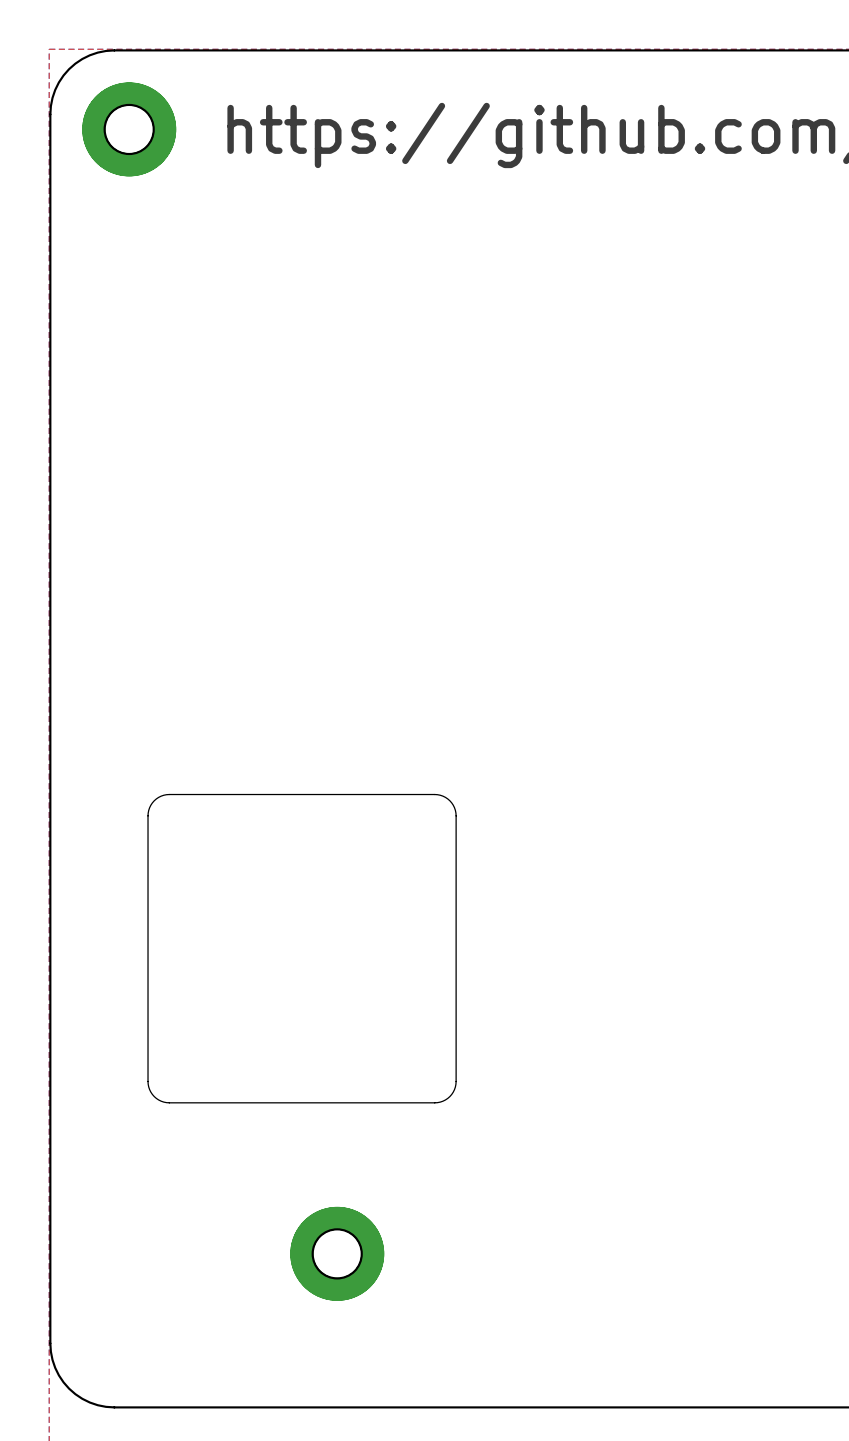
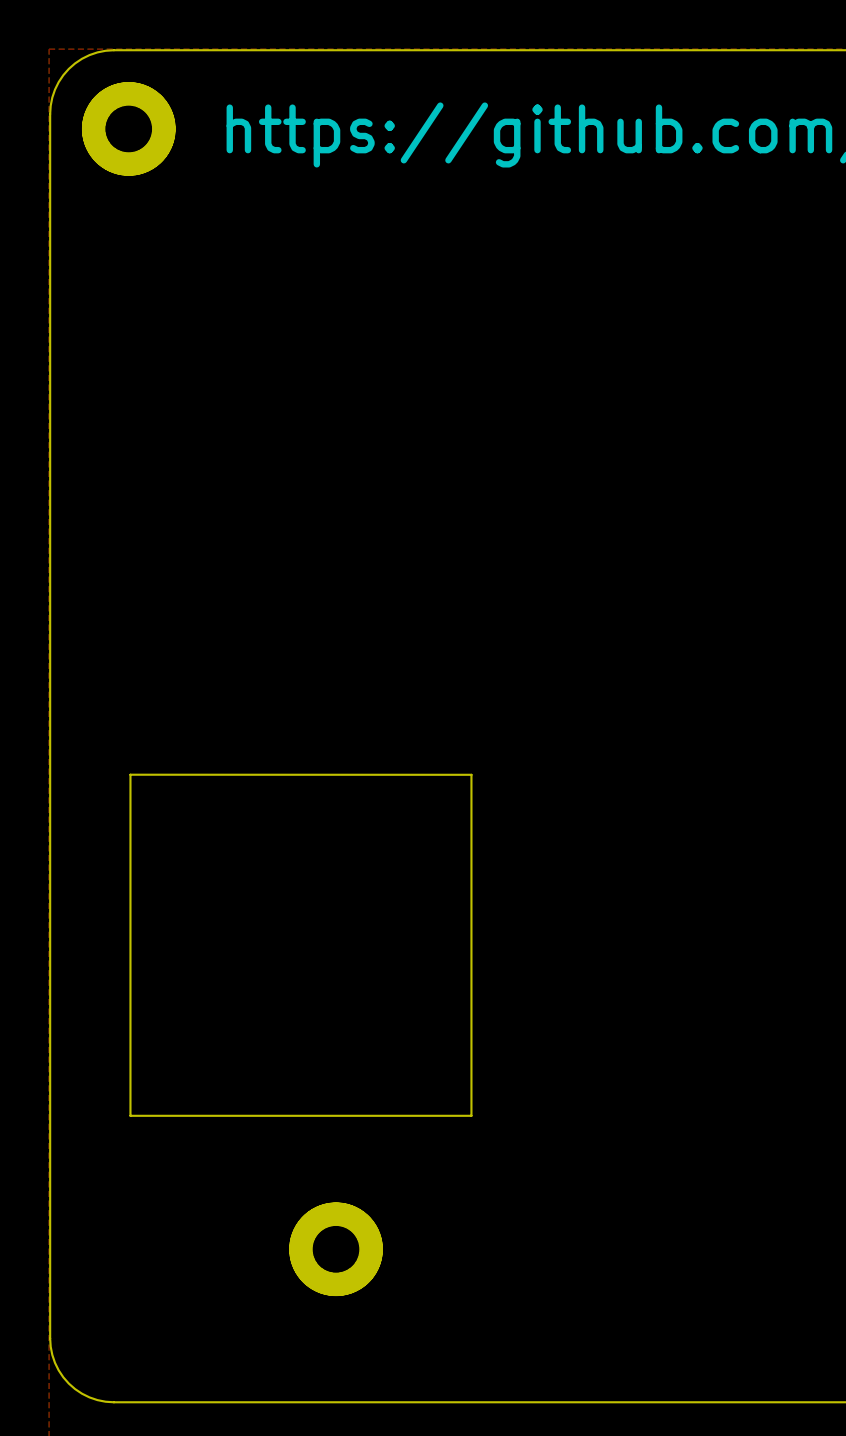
board edge: (169, 794) (434, 794) (442, 796) (449, 800) (454, 807) (456, 815) (456, 1081) (454, 1089) (449, 1096) (442, 1101) (434, 1102) (169, 1102) (161, 1101) (154, 1096) (149, 1089) (148, 1081) (148, 815) (149, 807) (154, 800) (161, 796) (169, 794) -> (130, 774) (130, 1115) (471, 1115) (471, 774) (130, 774)

